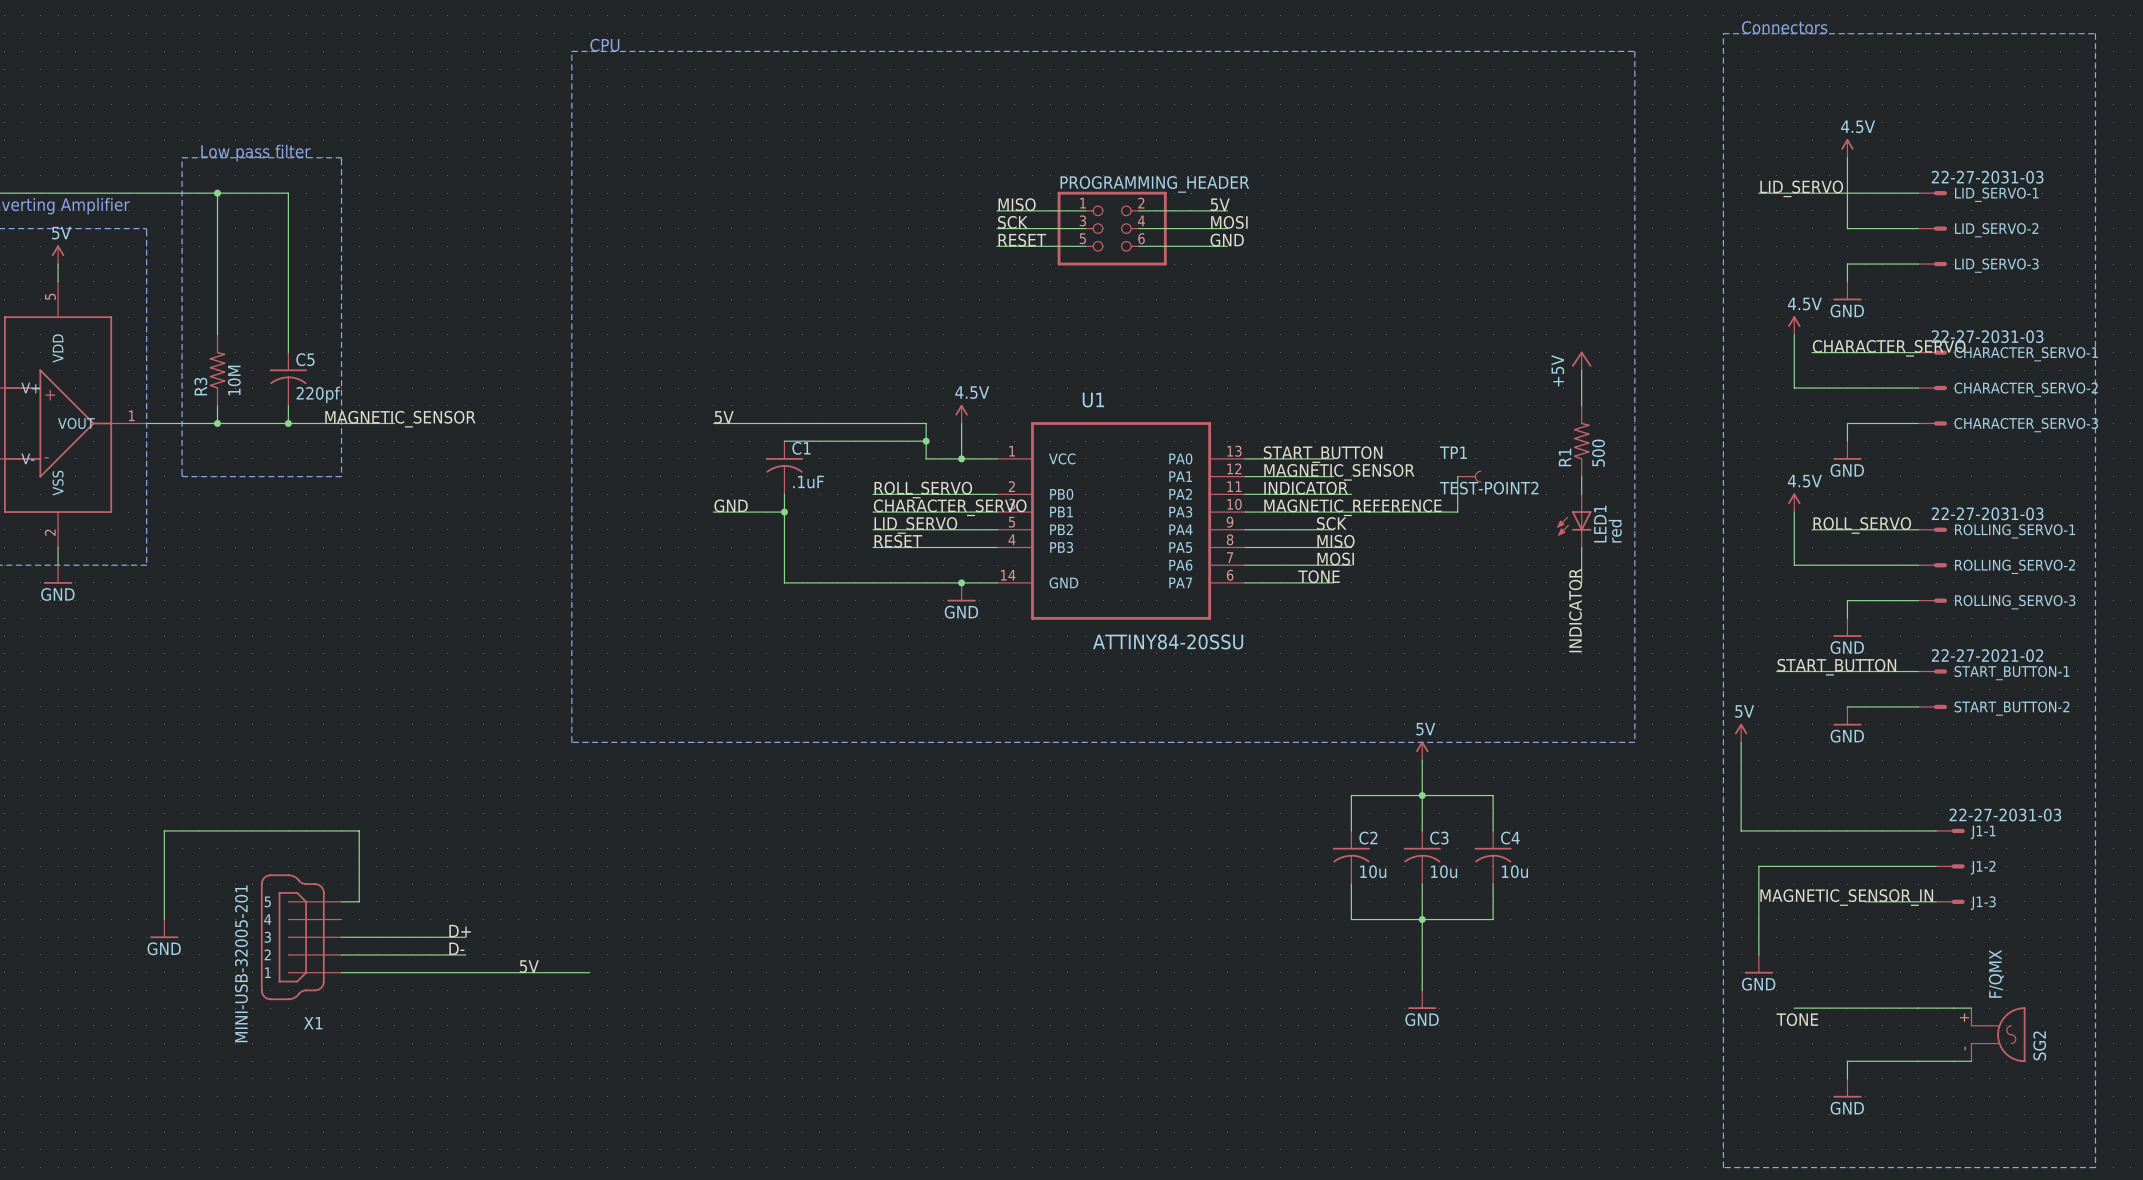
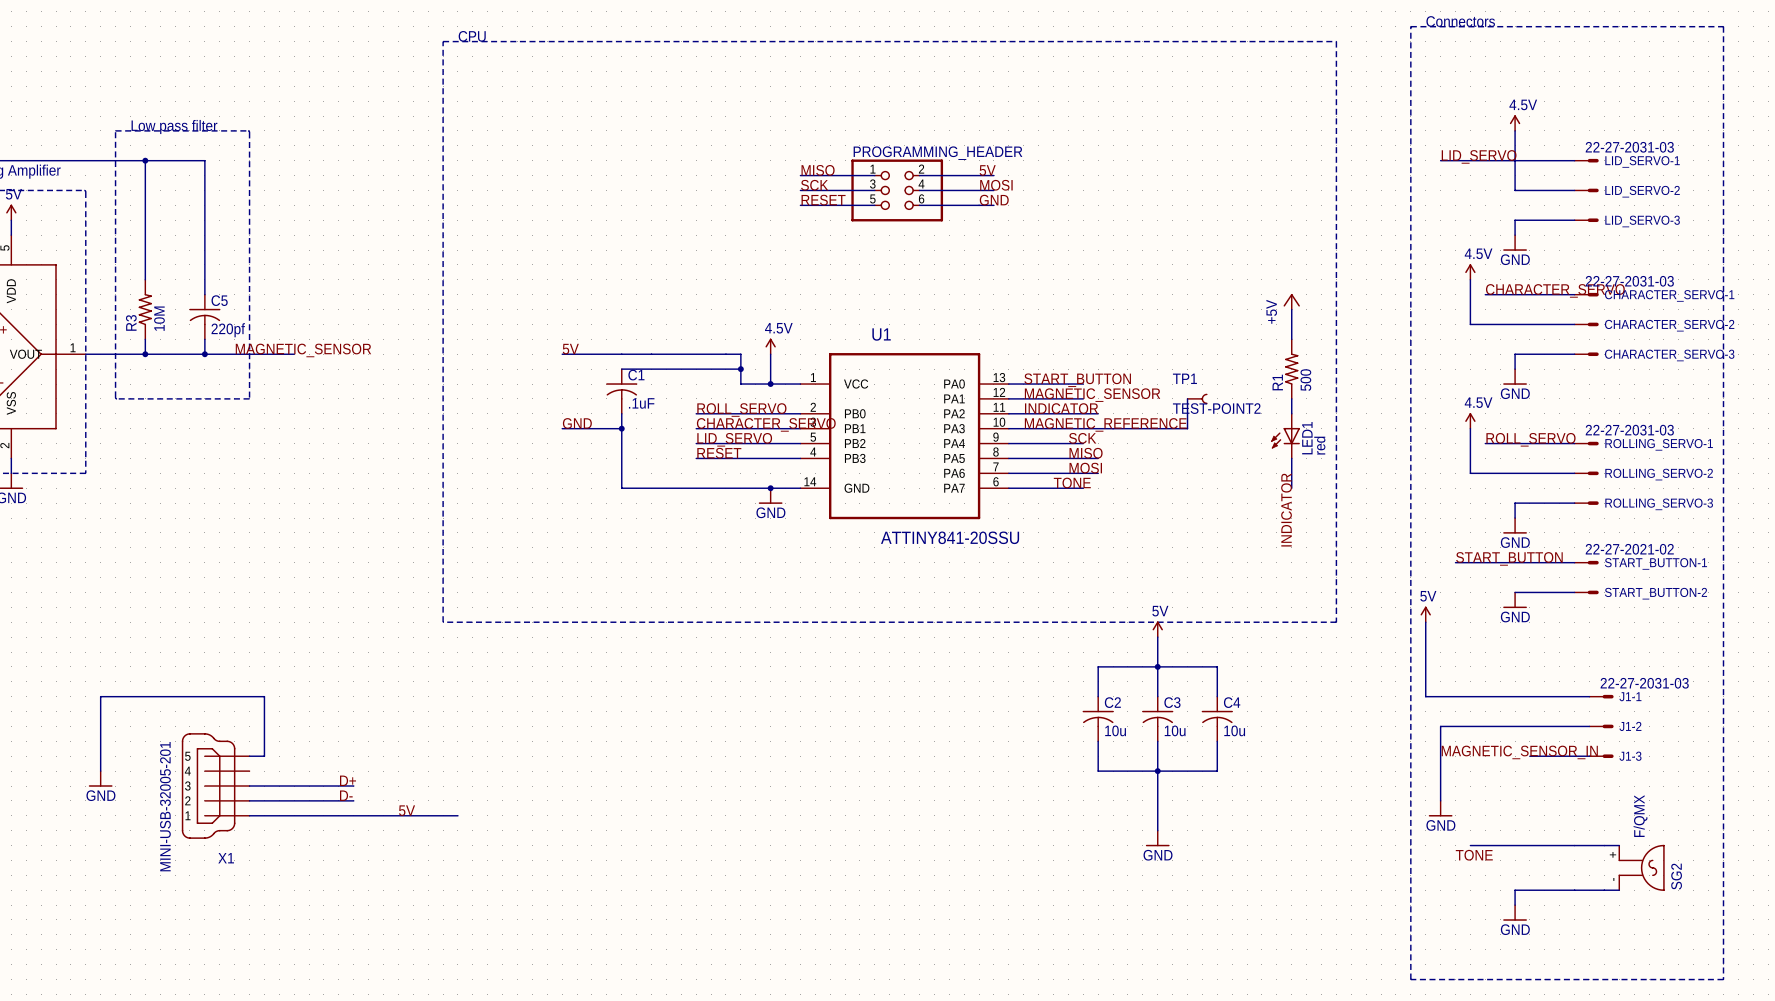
U1 value: ATTINY84-20SSU (1168, 641) -> ATTINY841-20SSU (950, 537)

